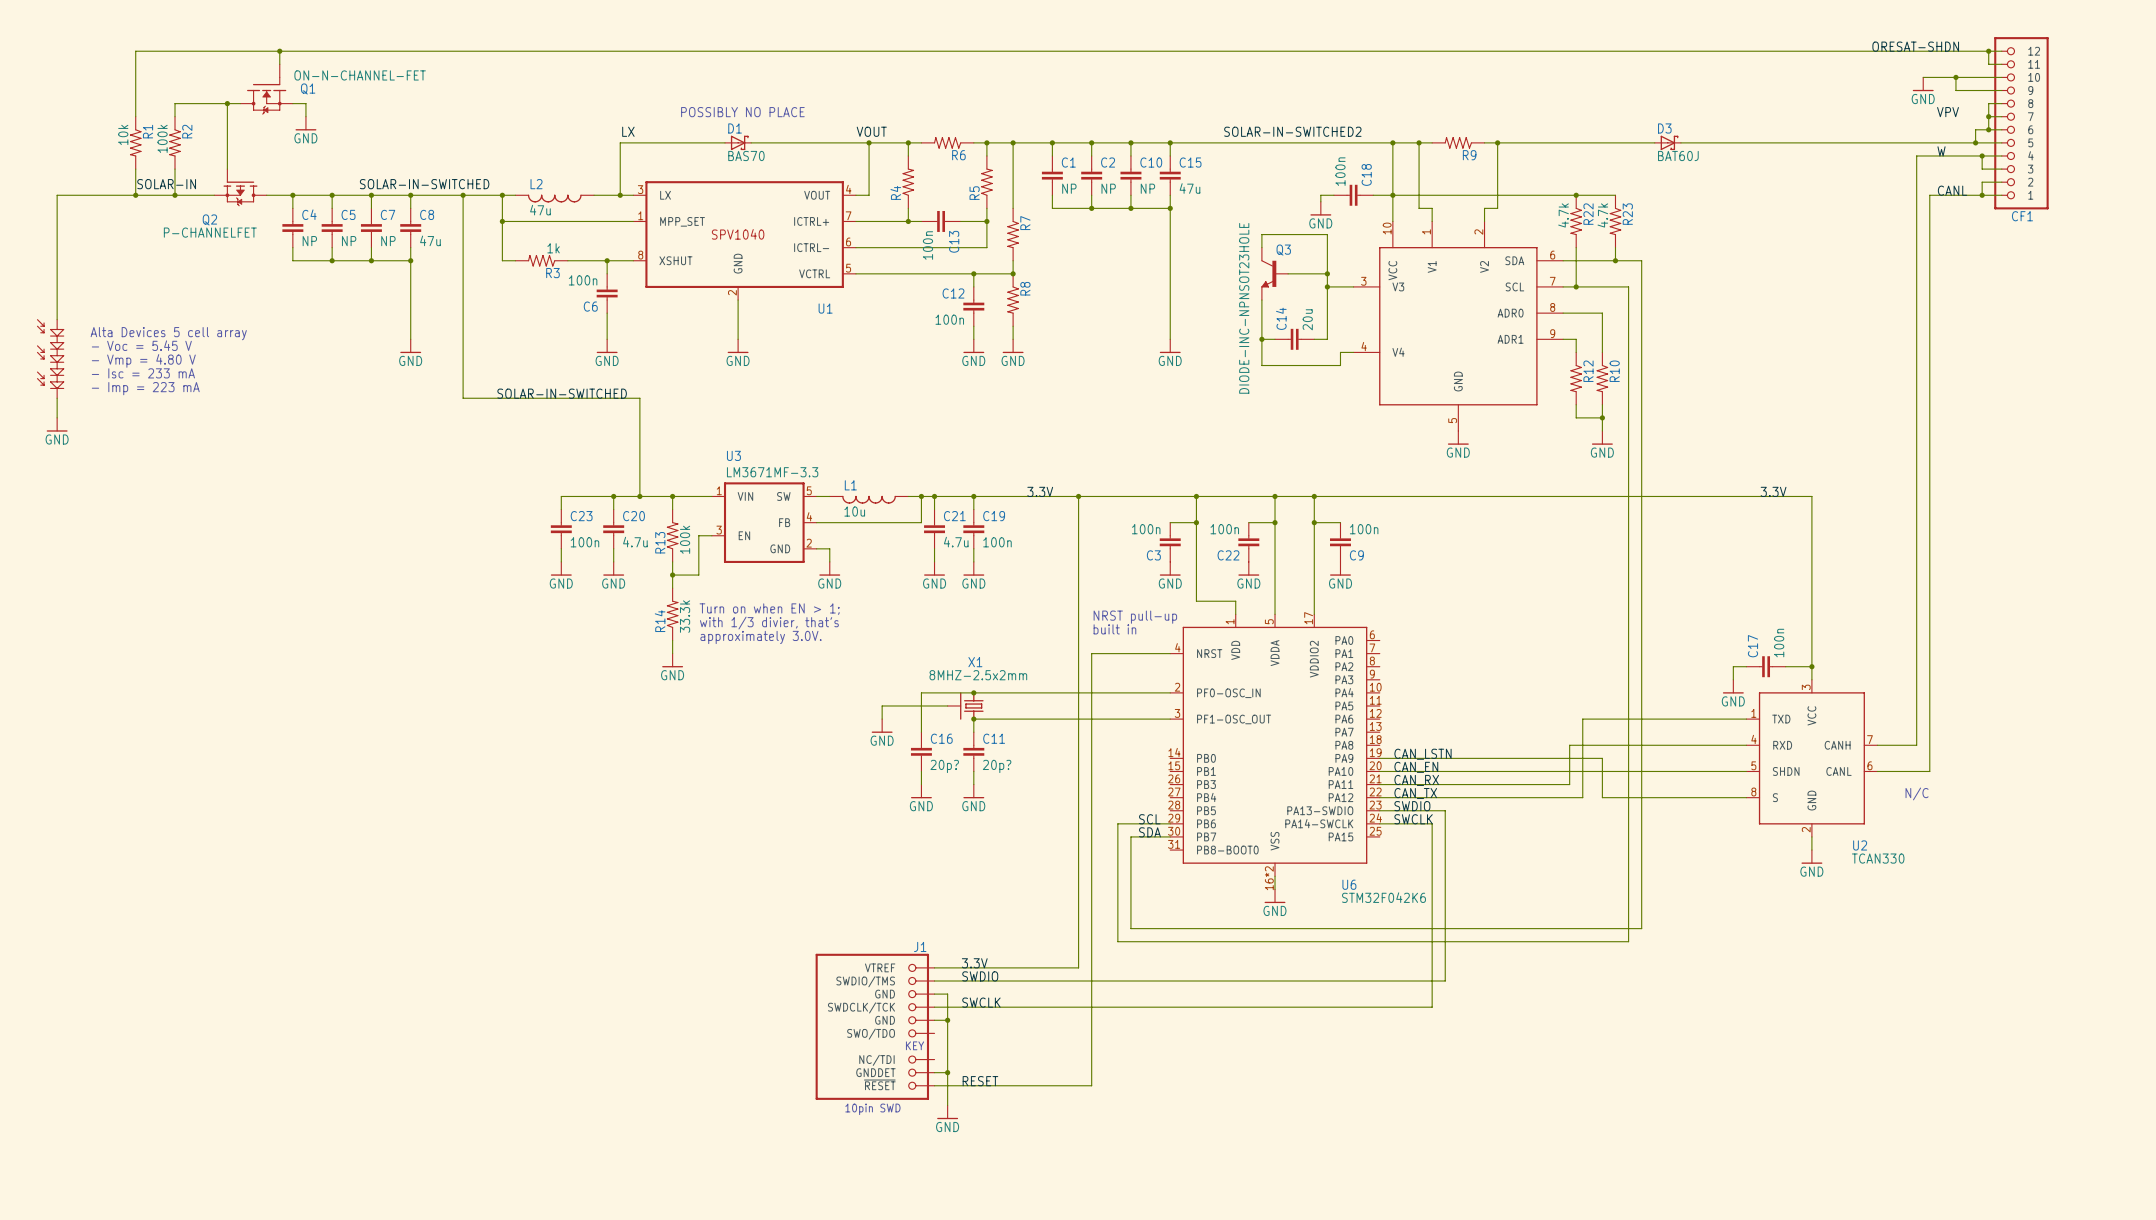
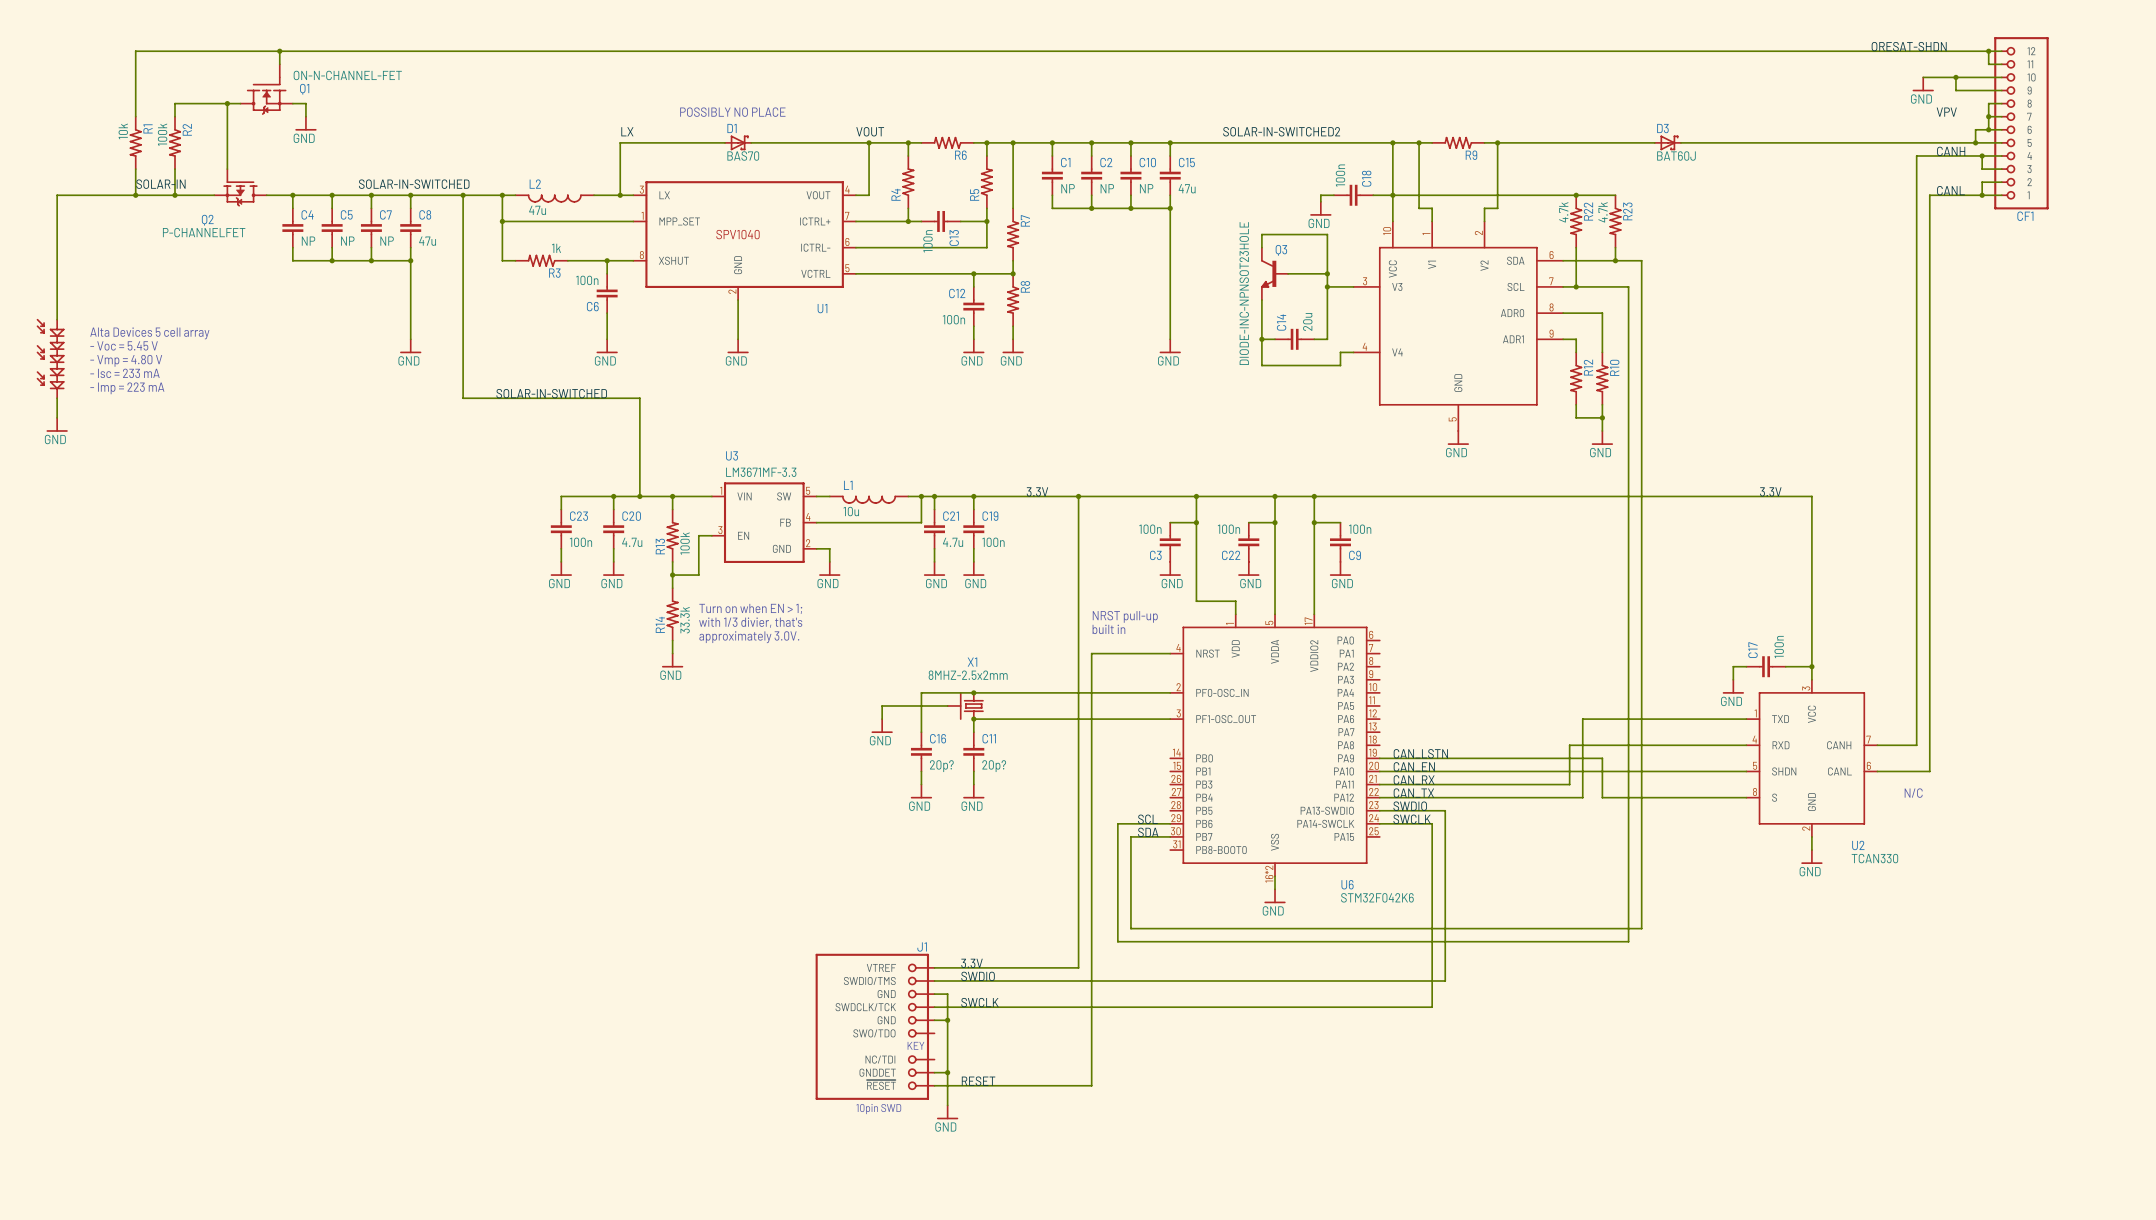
label: W (1941, 151) -> CANH (1951, 151)

